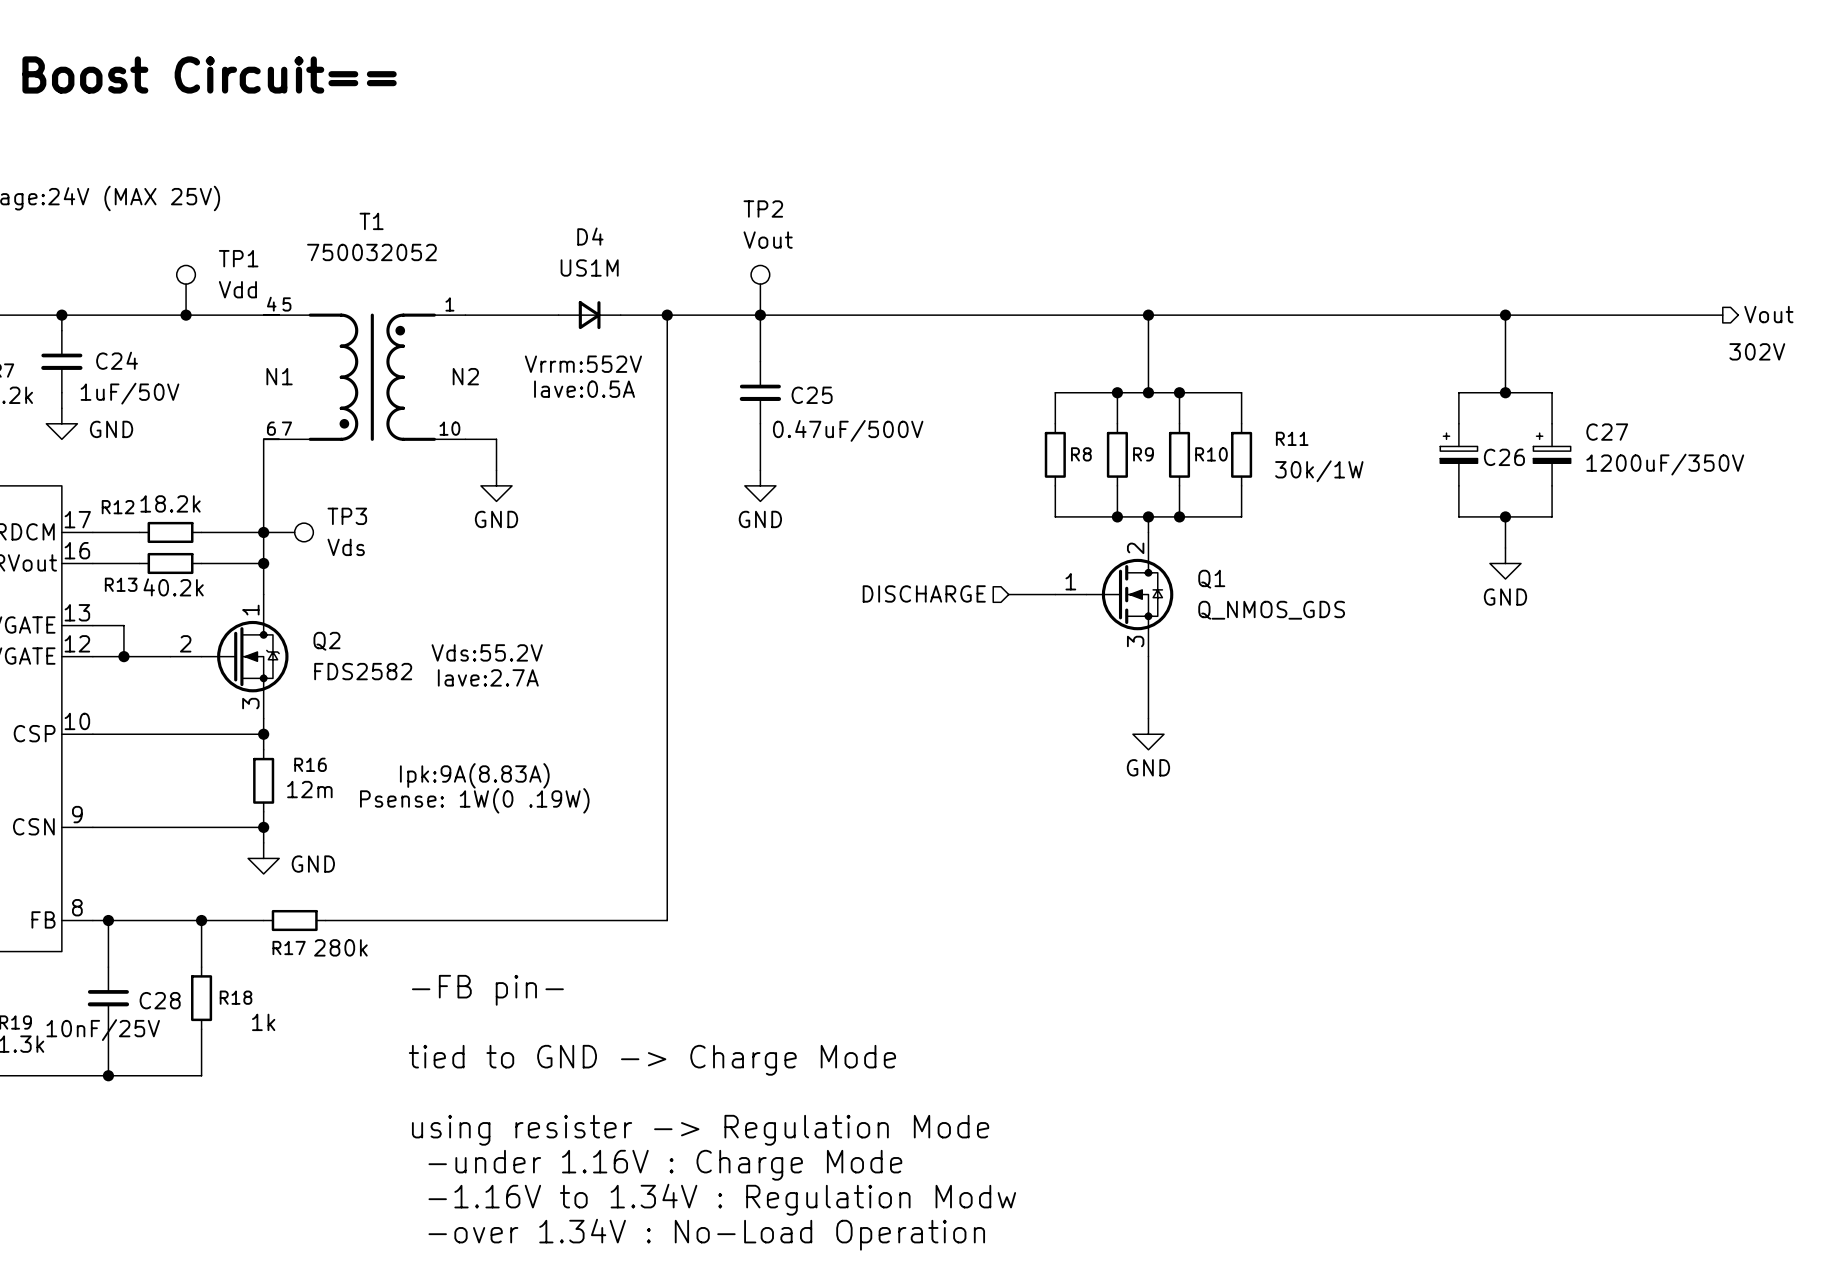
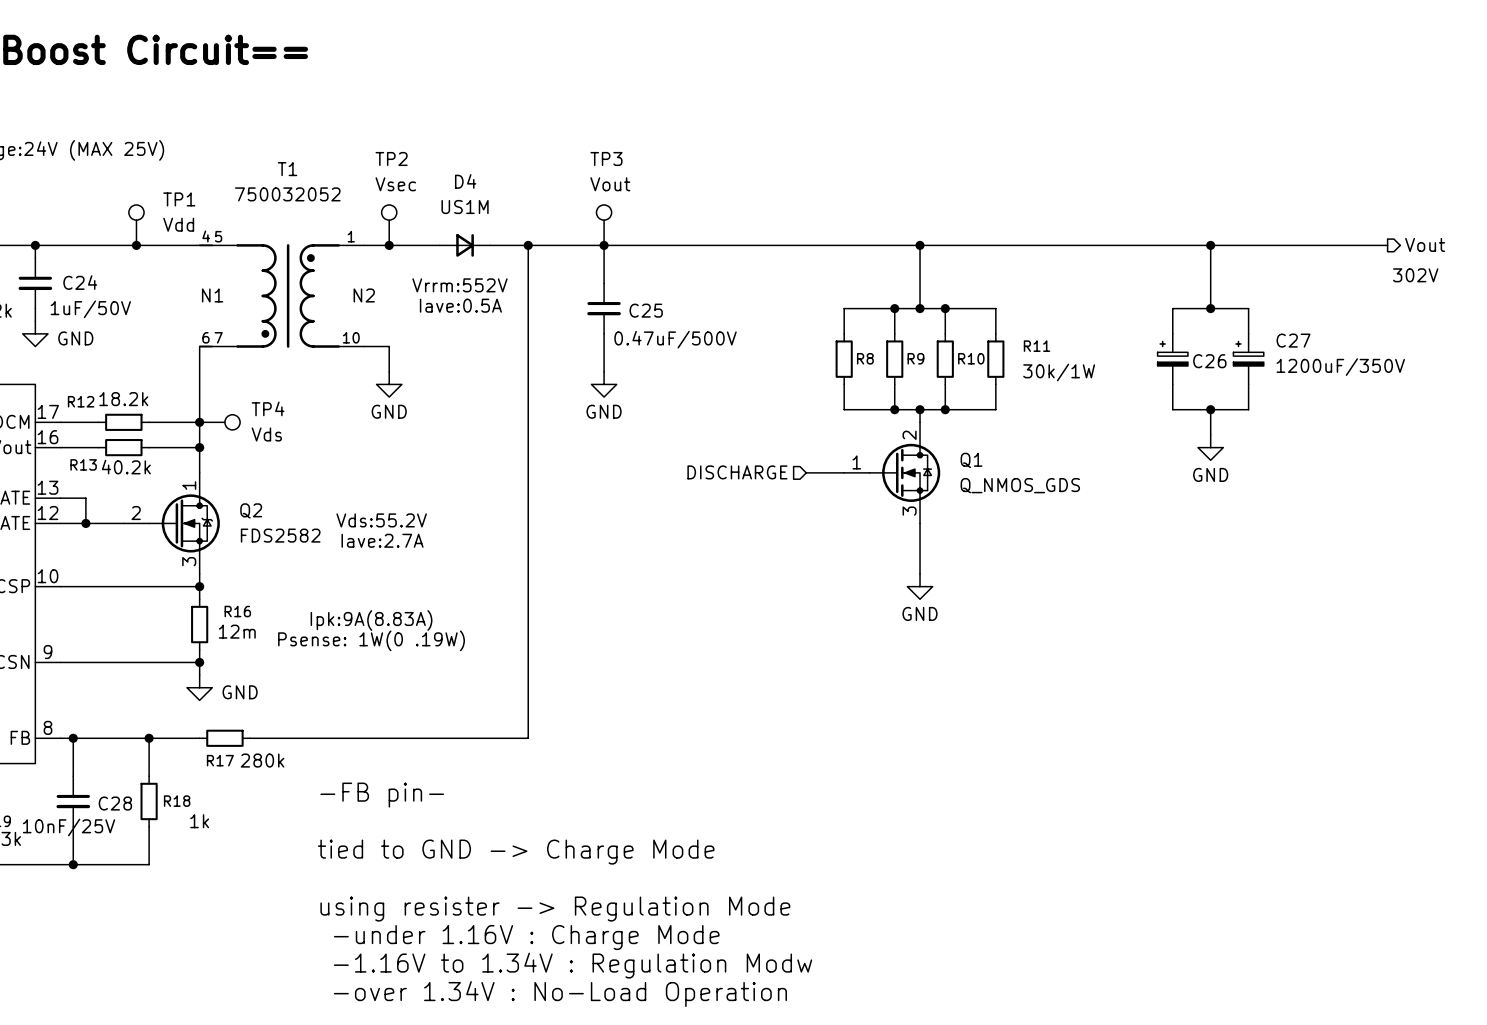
TP2 name: TP2 (763, 209) -> TP3 (606, 158)
TP2: none -> Vsec (389, 225)
junction: none -> (389, 245)
TP3 name: TP3 (347, 516) -> TP4 (268, 408)

